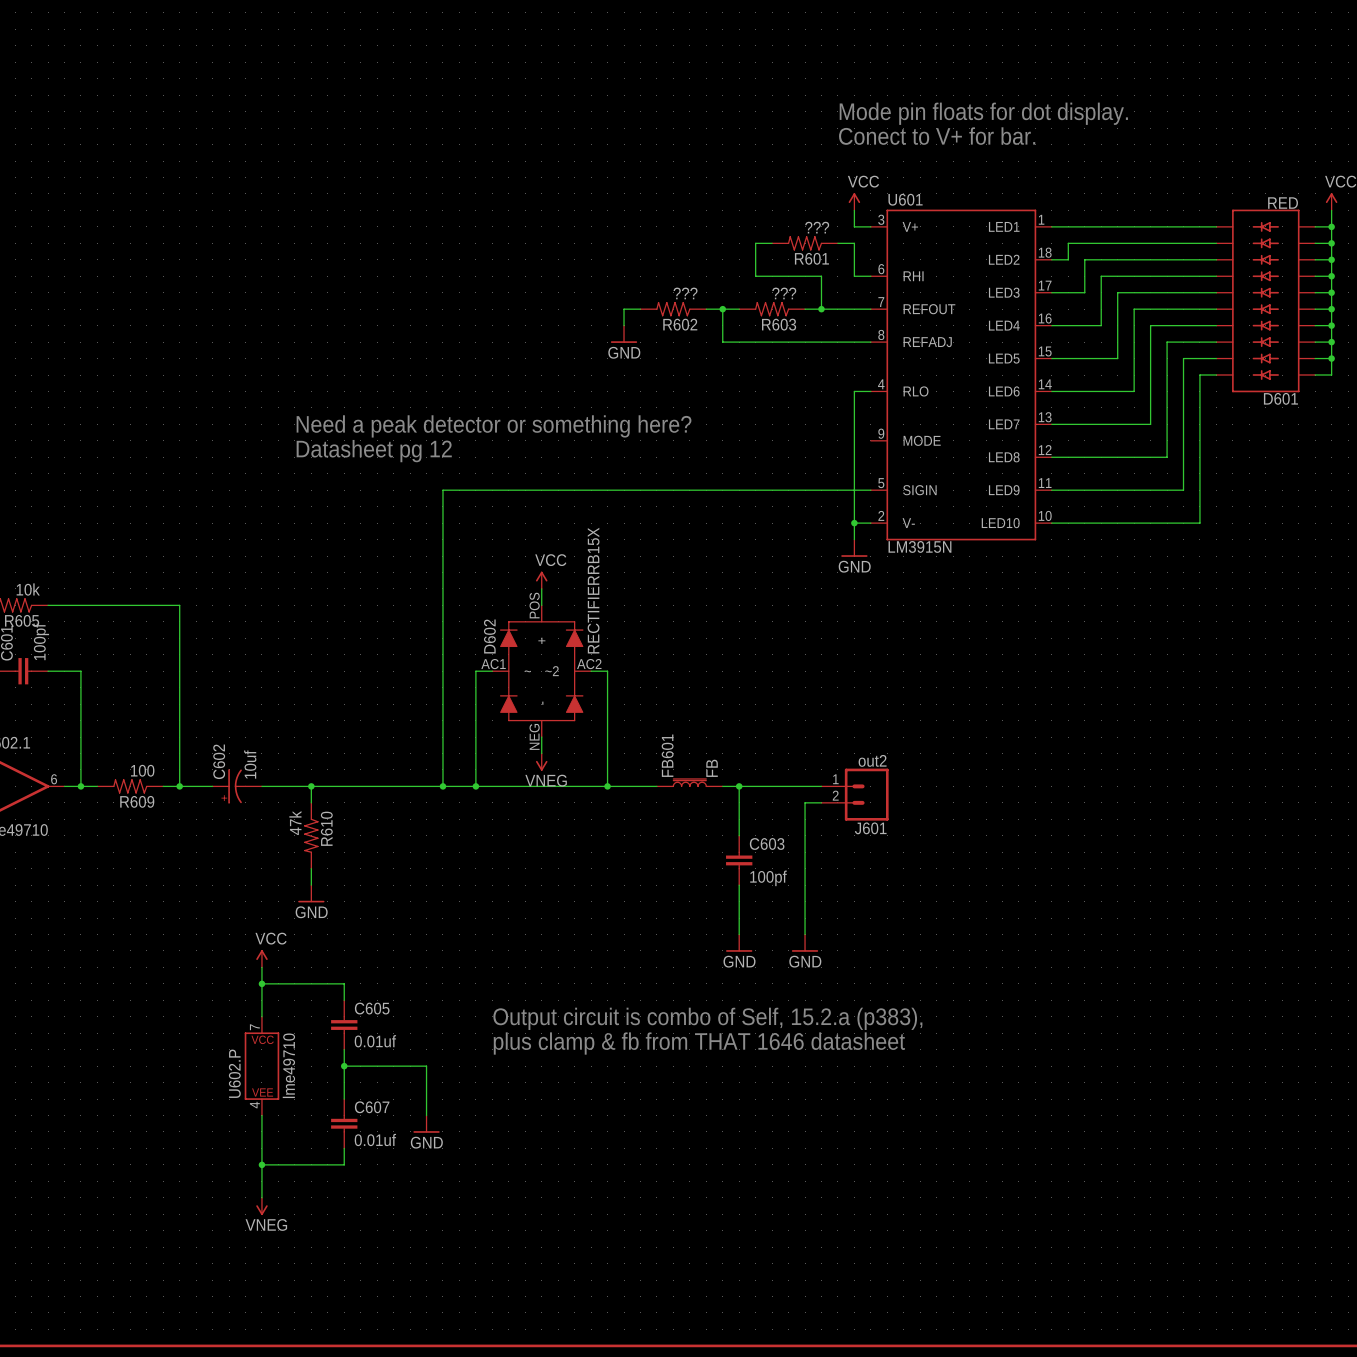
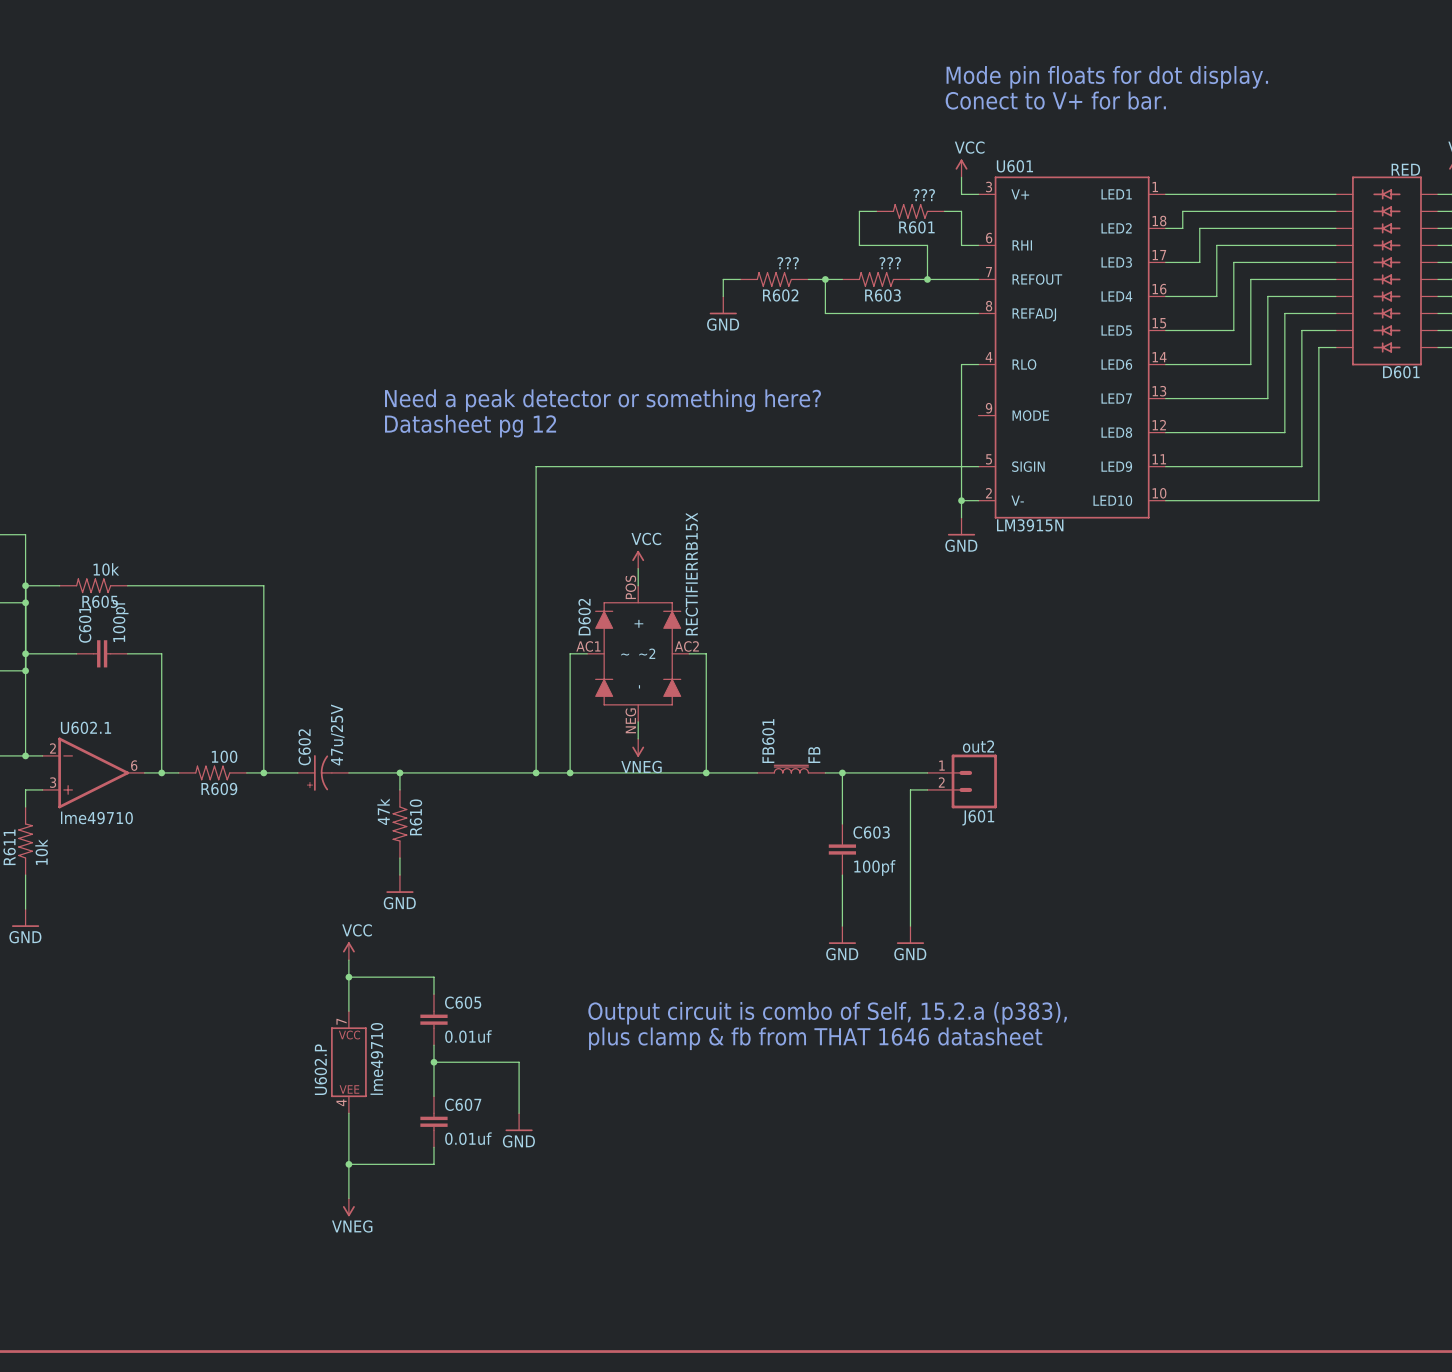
C602 value: 10uf (250, 764) -> 47u/25V (337, 734)

